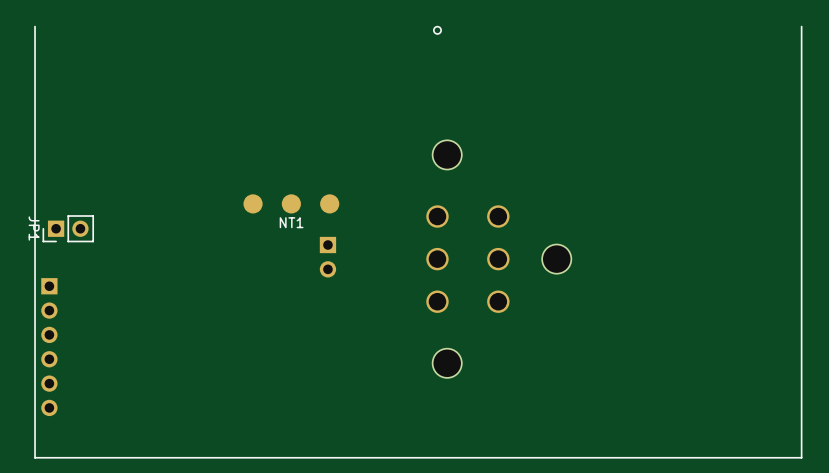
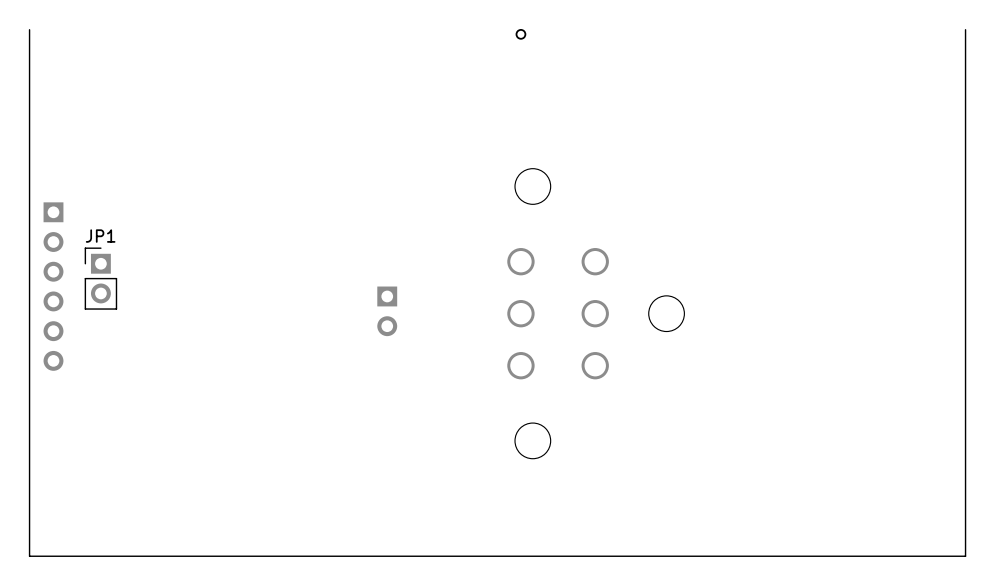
NT1: (291, 203) -> none
JP1 rotation: 0° (68, 228) -> 90° clockwise (100, 278)
part position: (49, 347) -> (53, 286)

